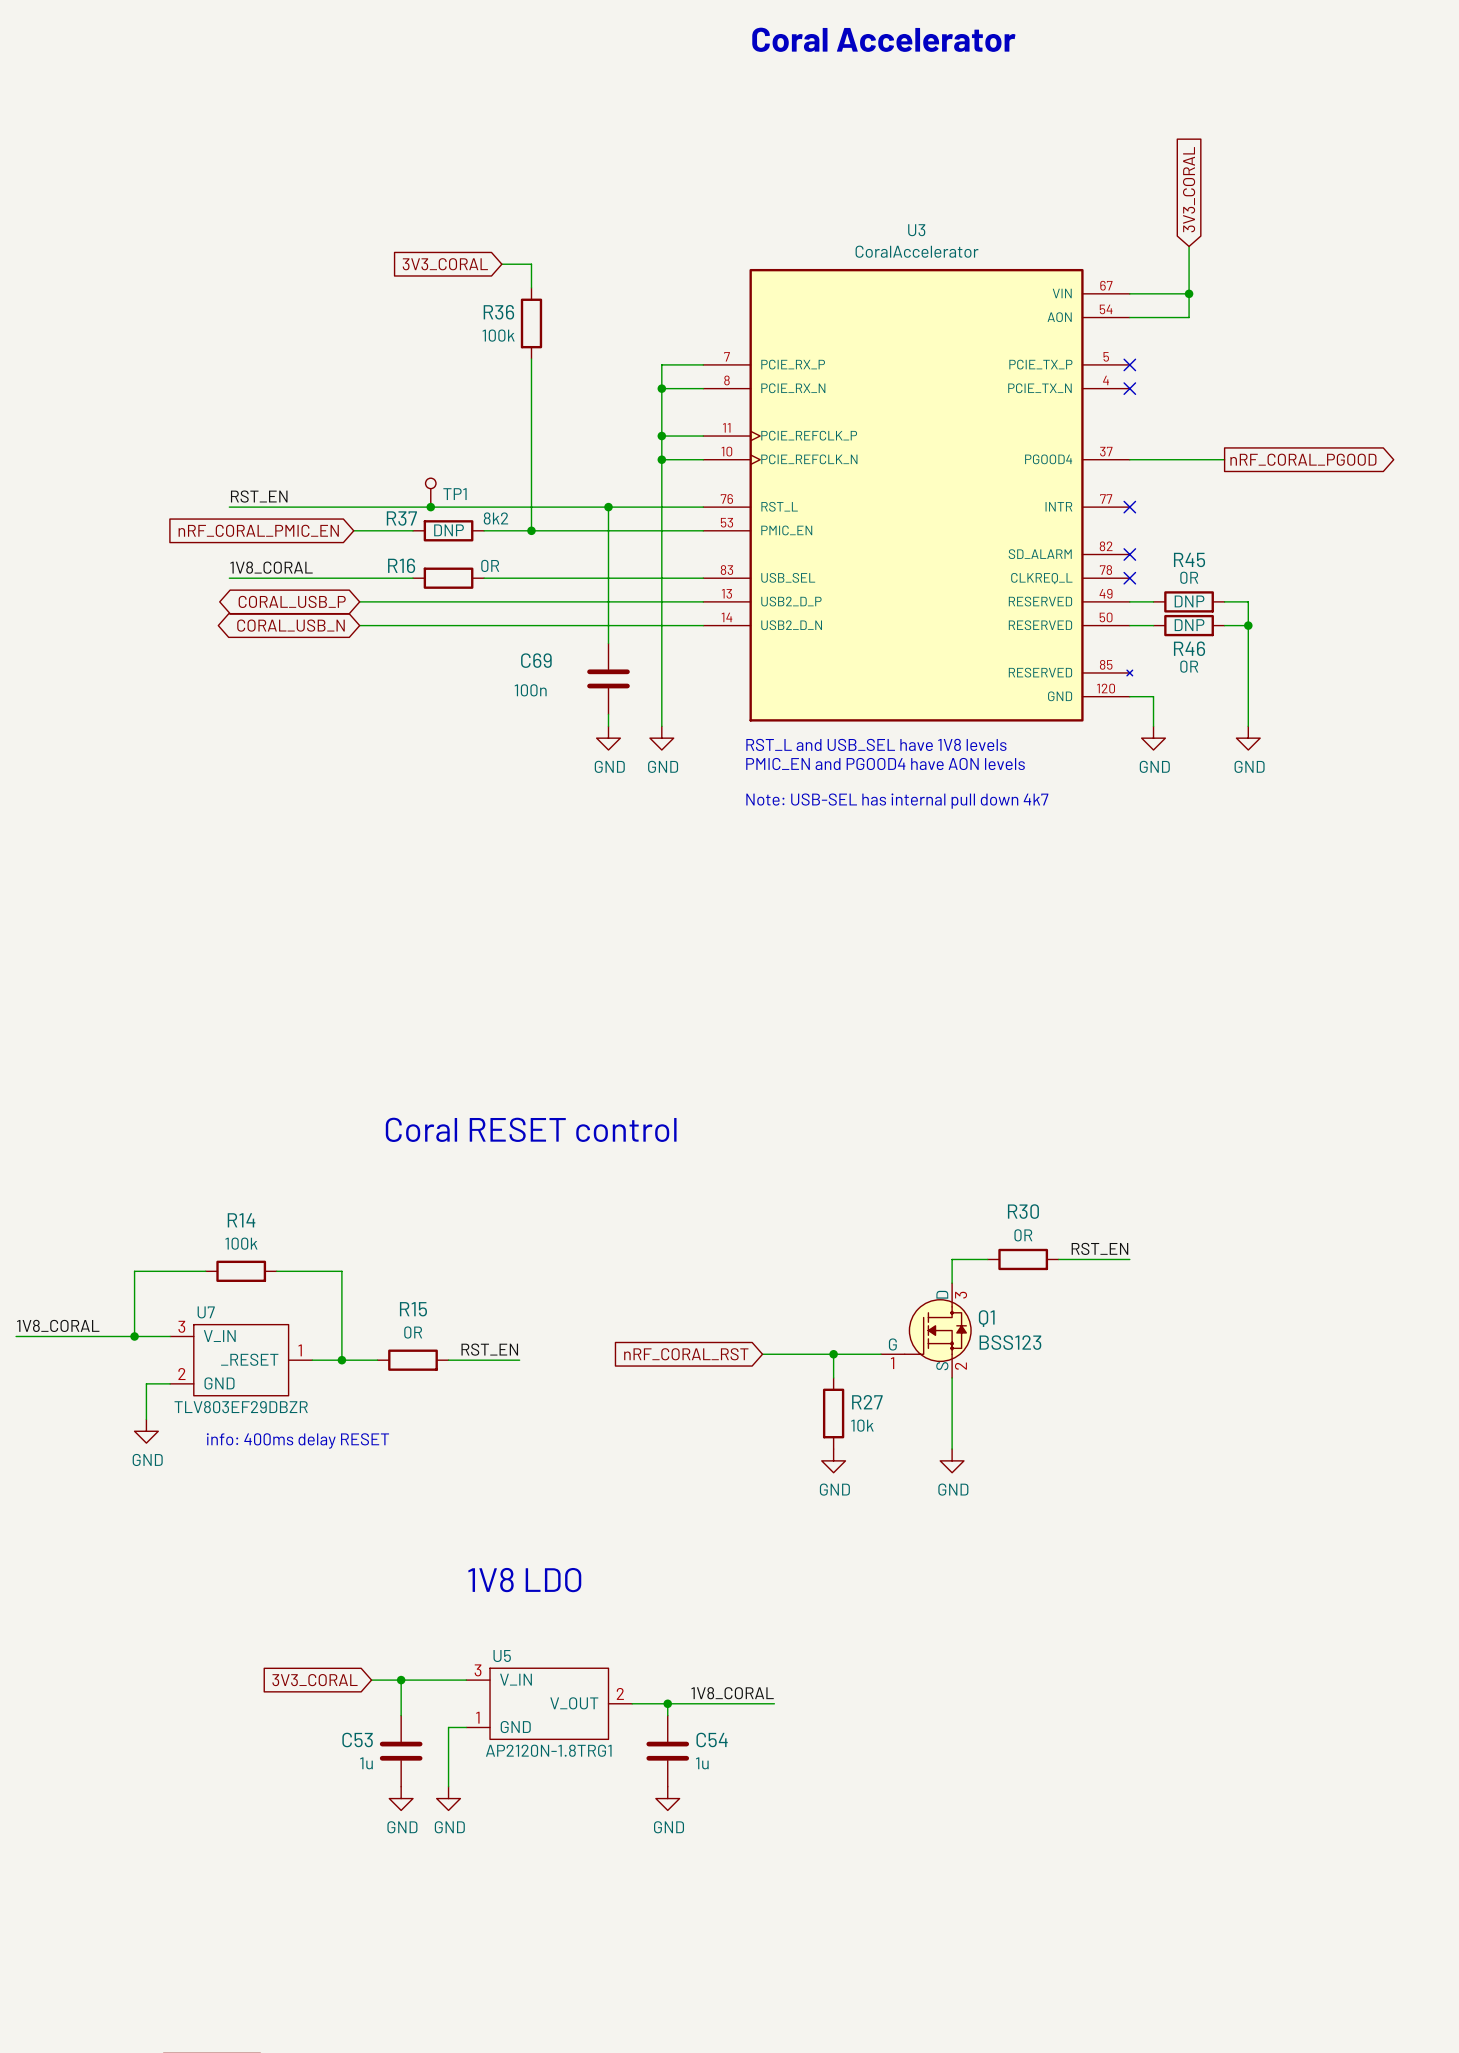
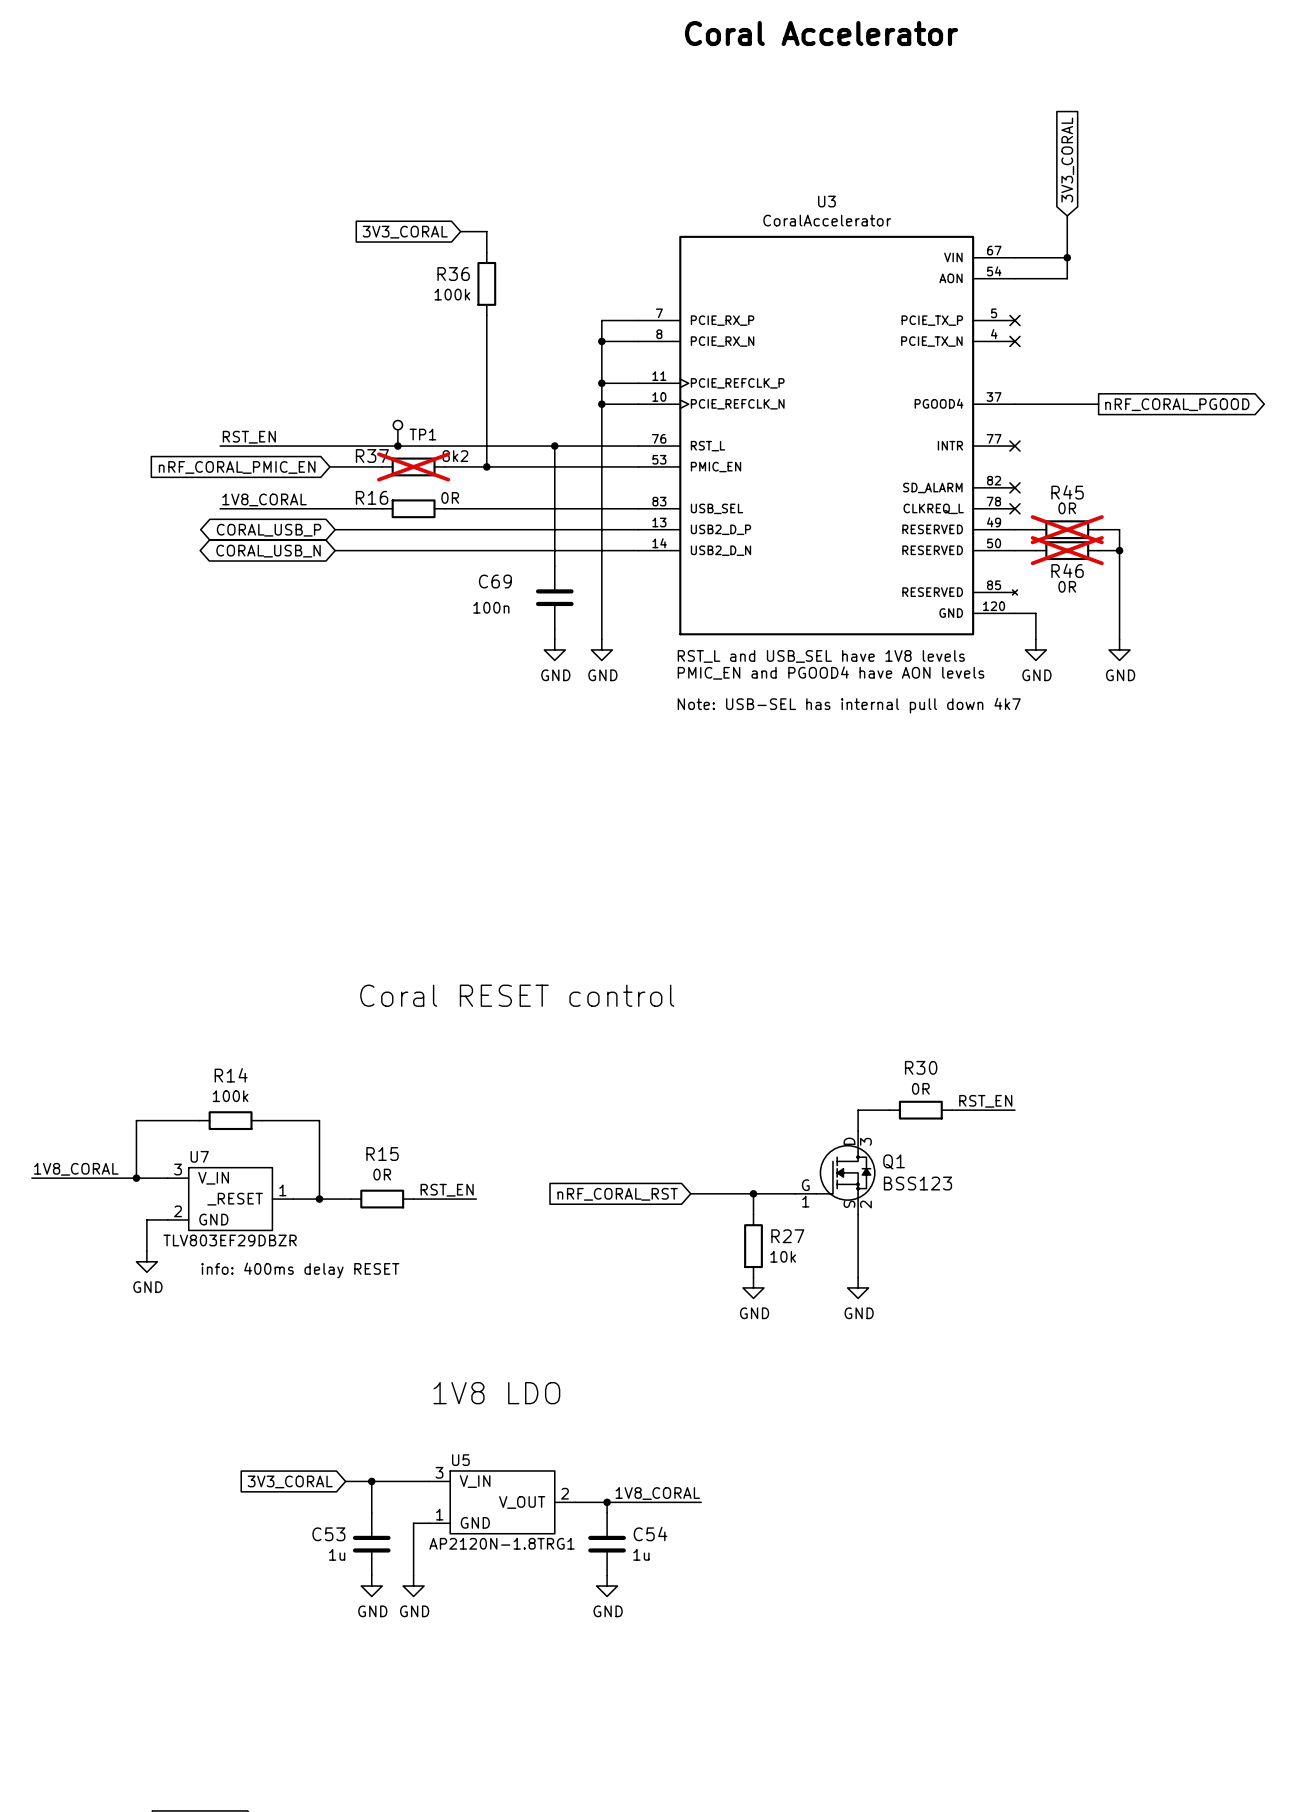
R37 do-not-place cross: none -> (413, 466)
R37 text: DNP (449, 530) -> none
R45 do-not-place cross: none -> (1067, 529)
R45 text: DNP (1189, 601) -> none
R46 do-not-place cross: none -> (1067, 550)
R46 text: DNP (1189, 625) -> none

